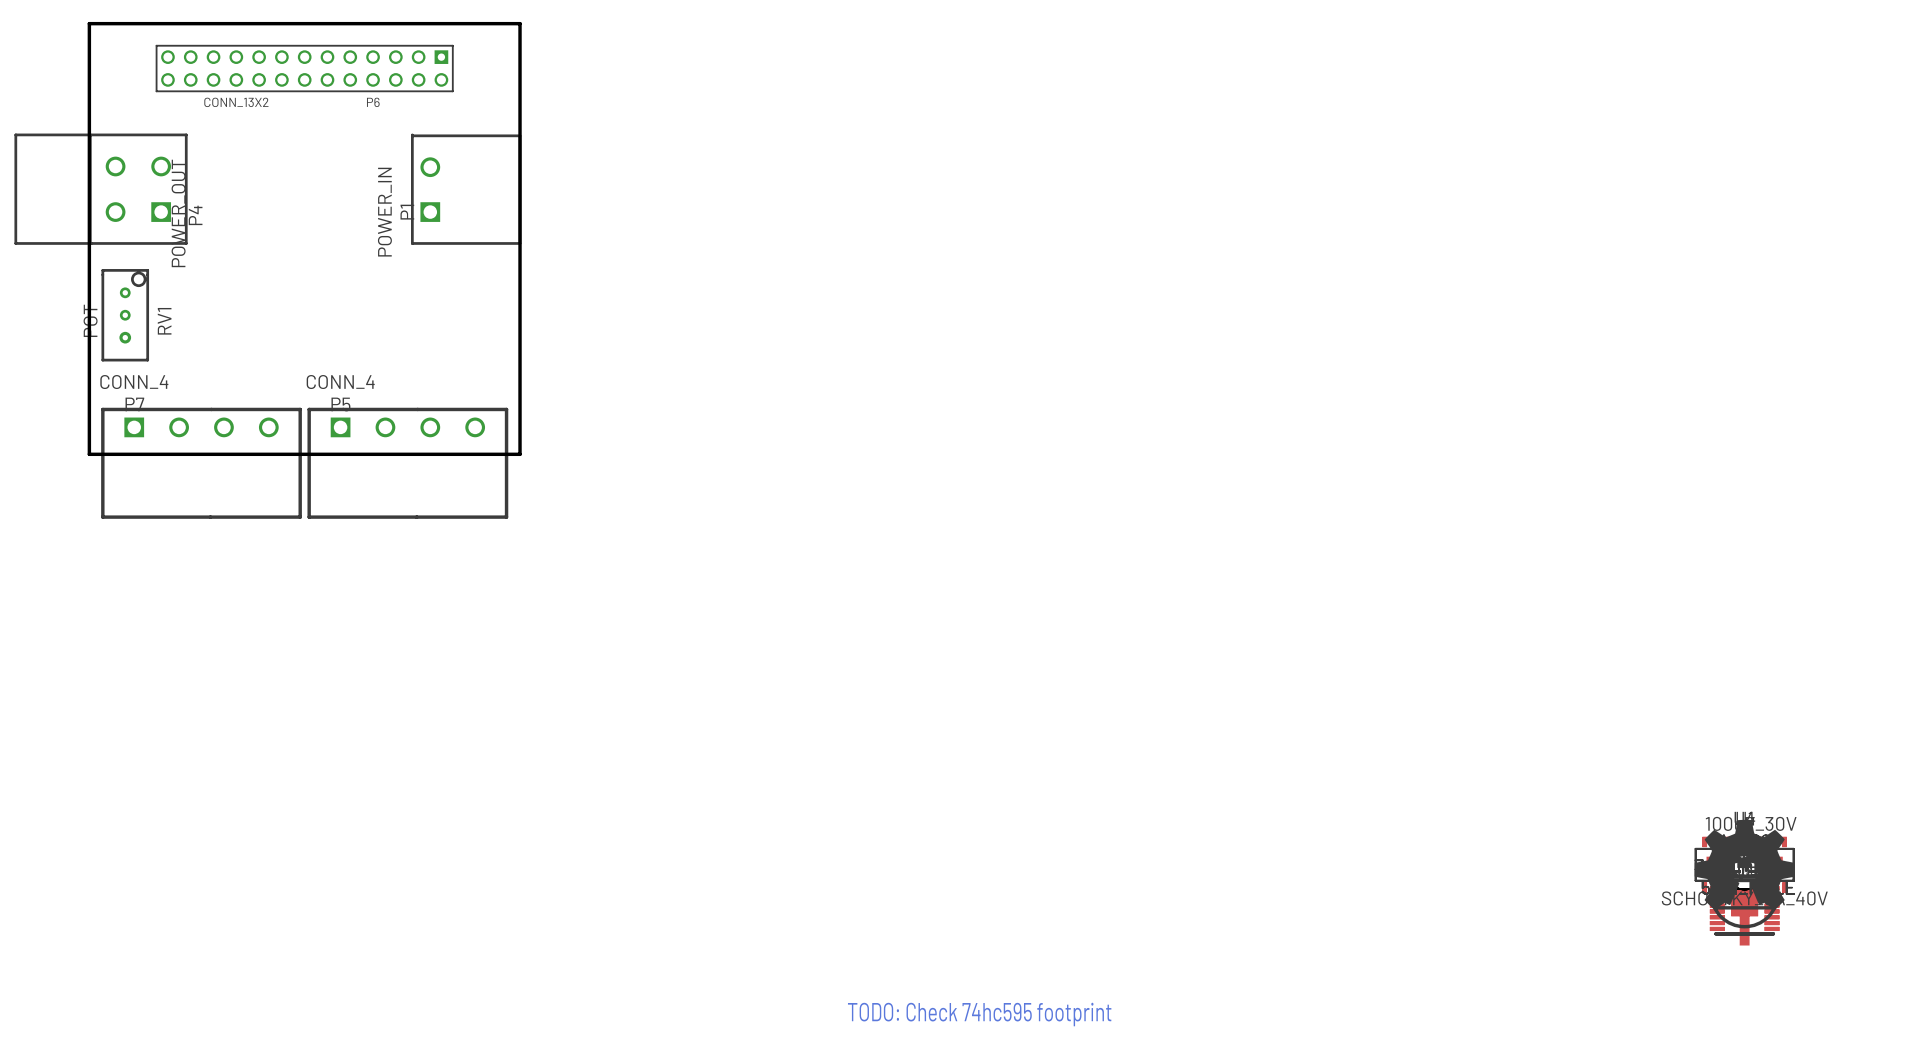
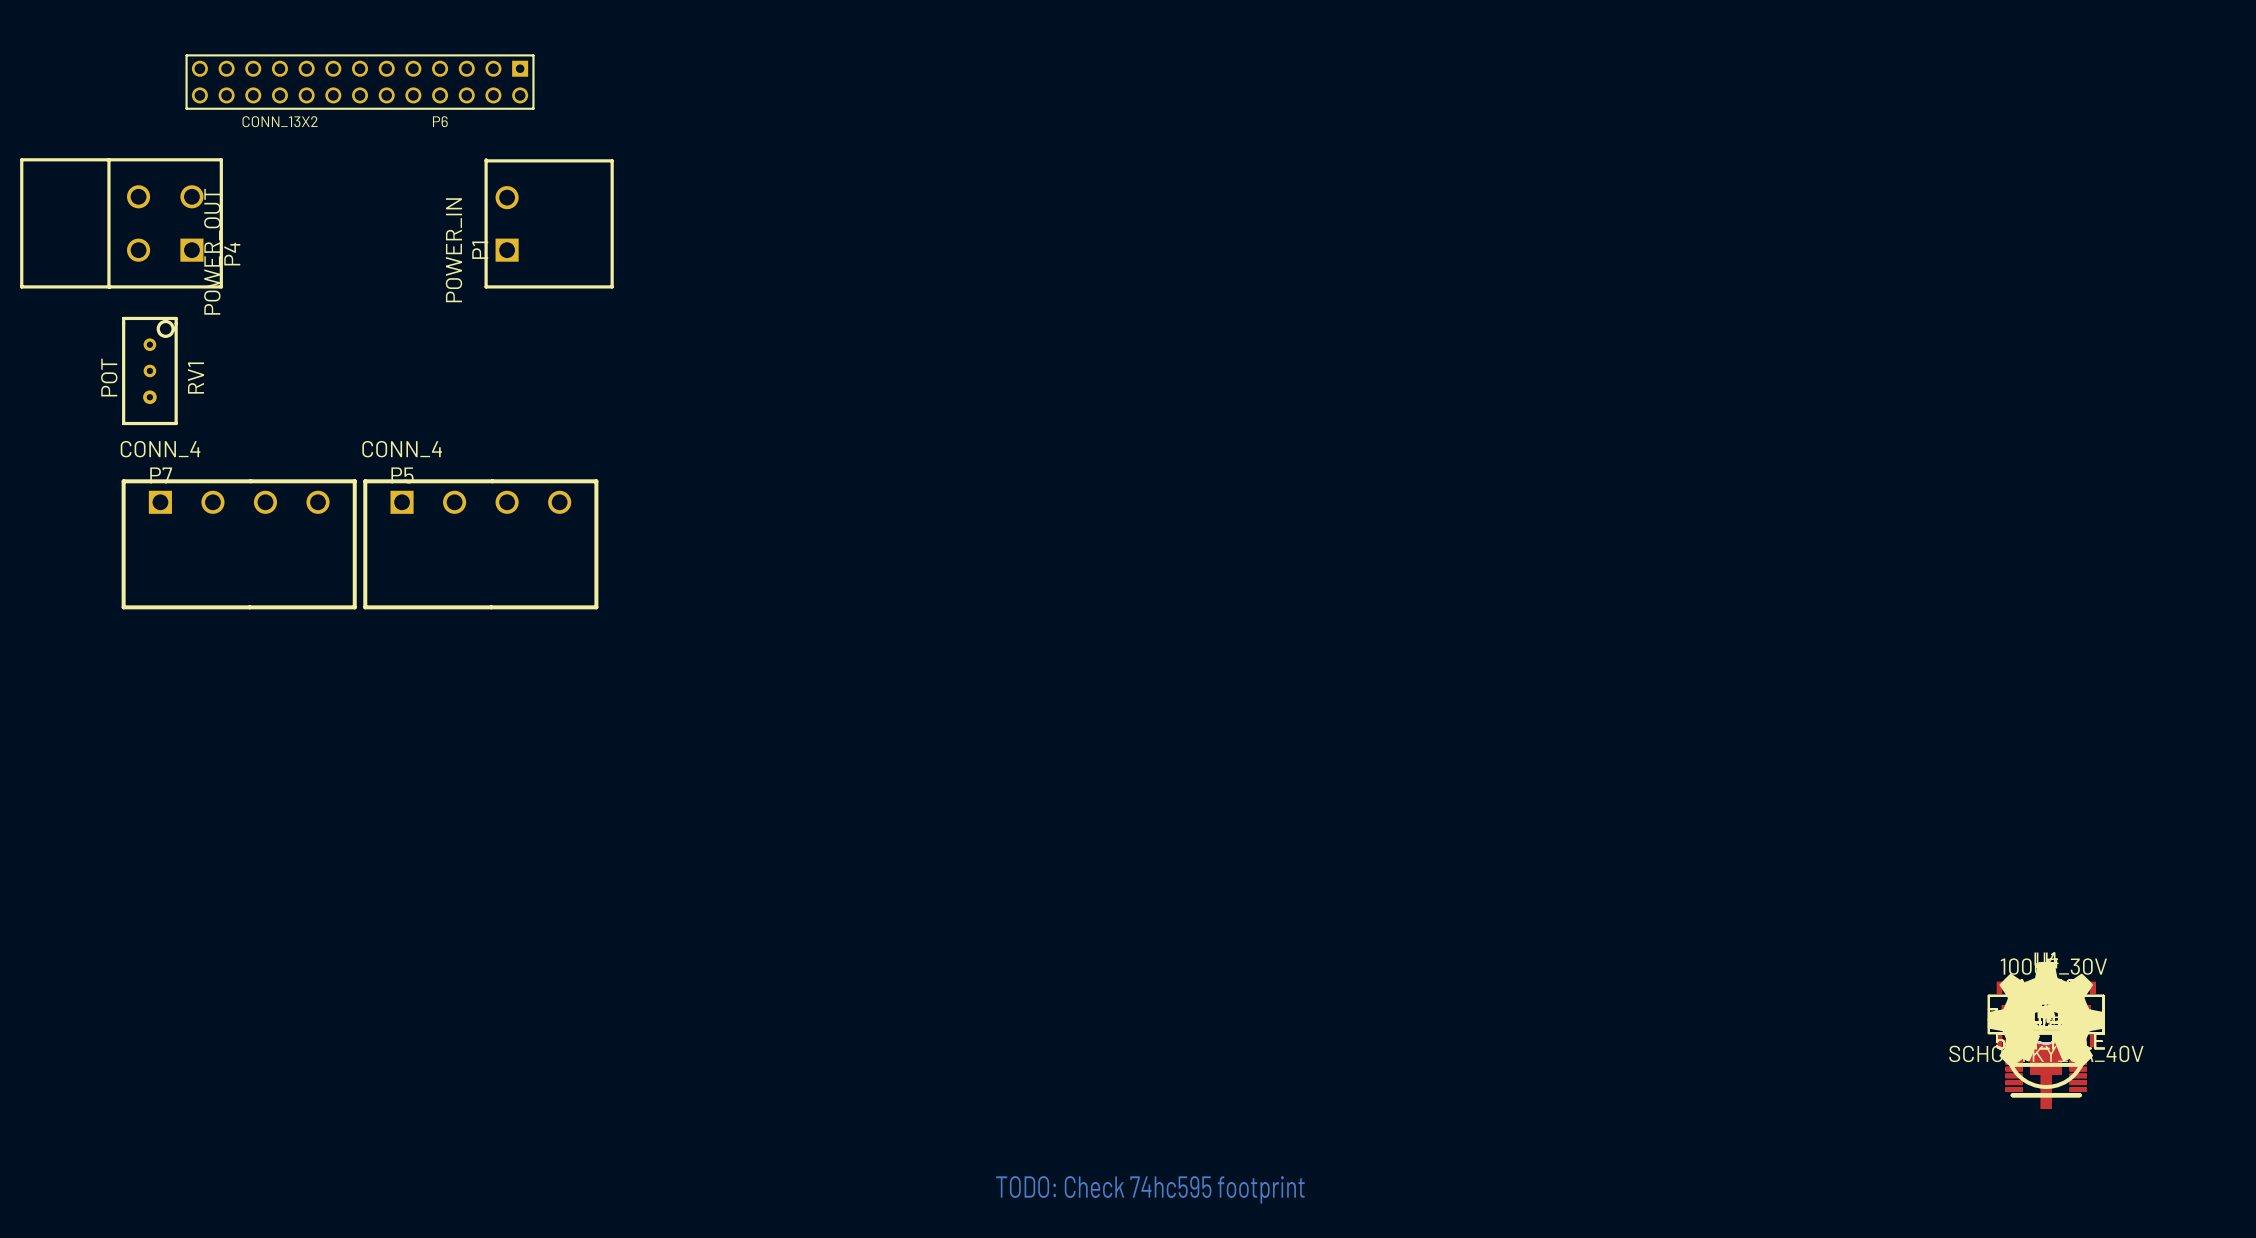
board edge: (89, 23) (89, 454) (520, 454) (520, 23) (89, 23) -> none

